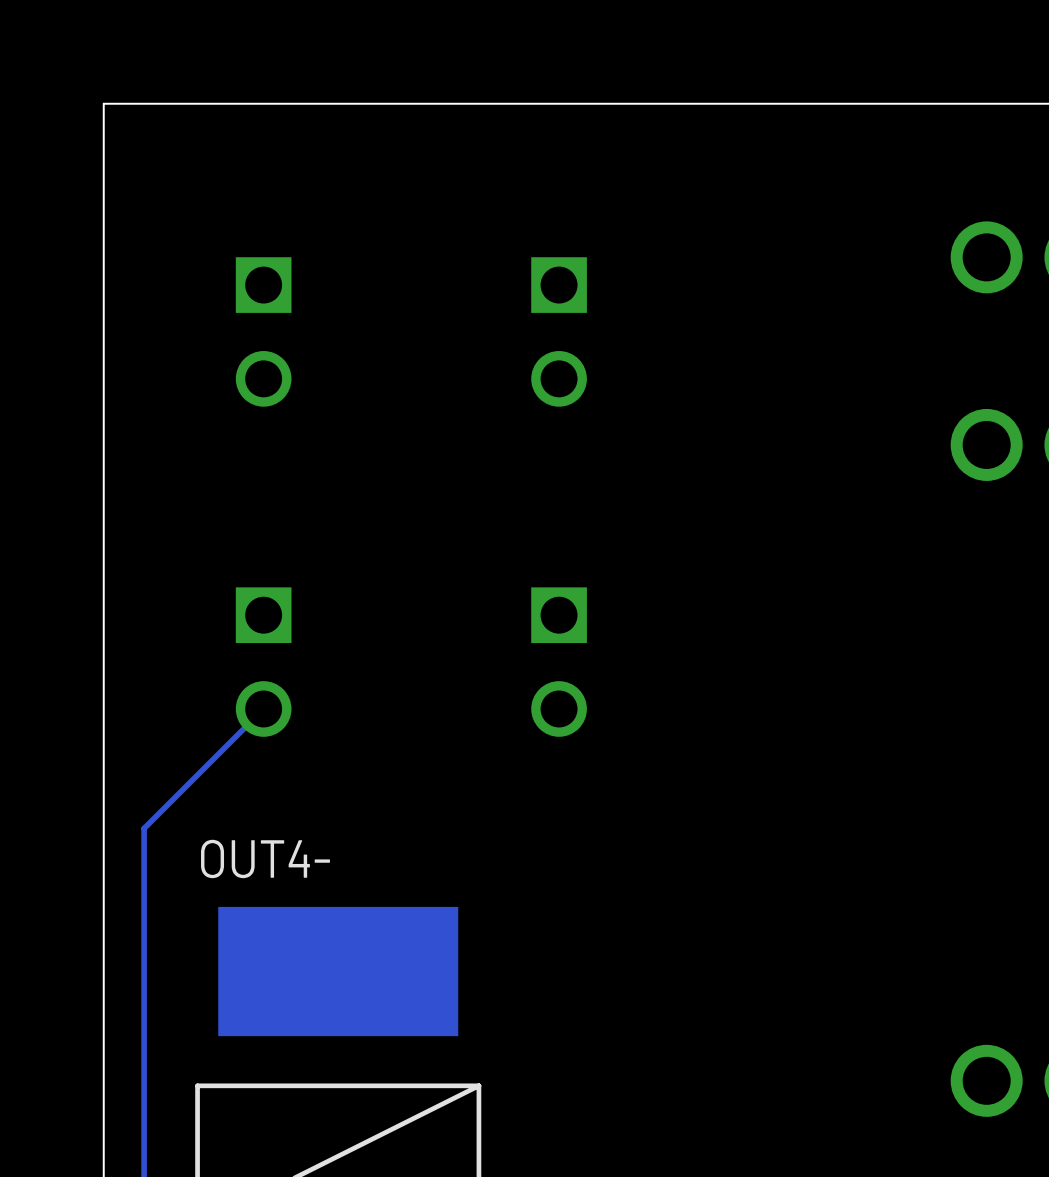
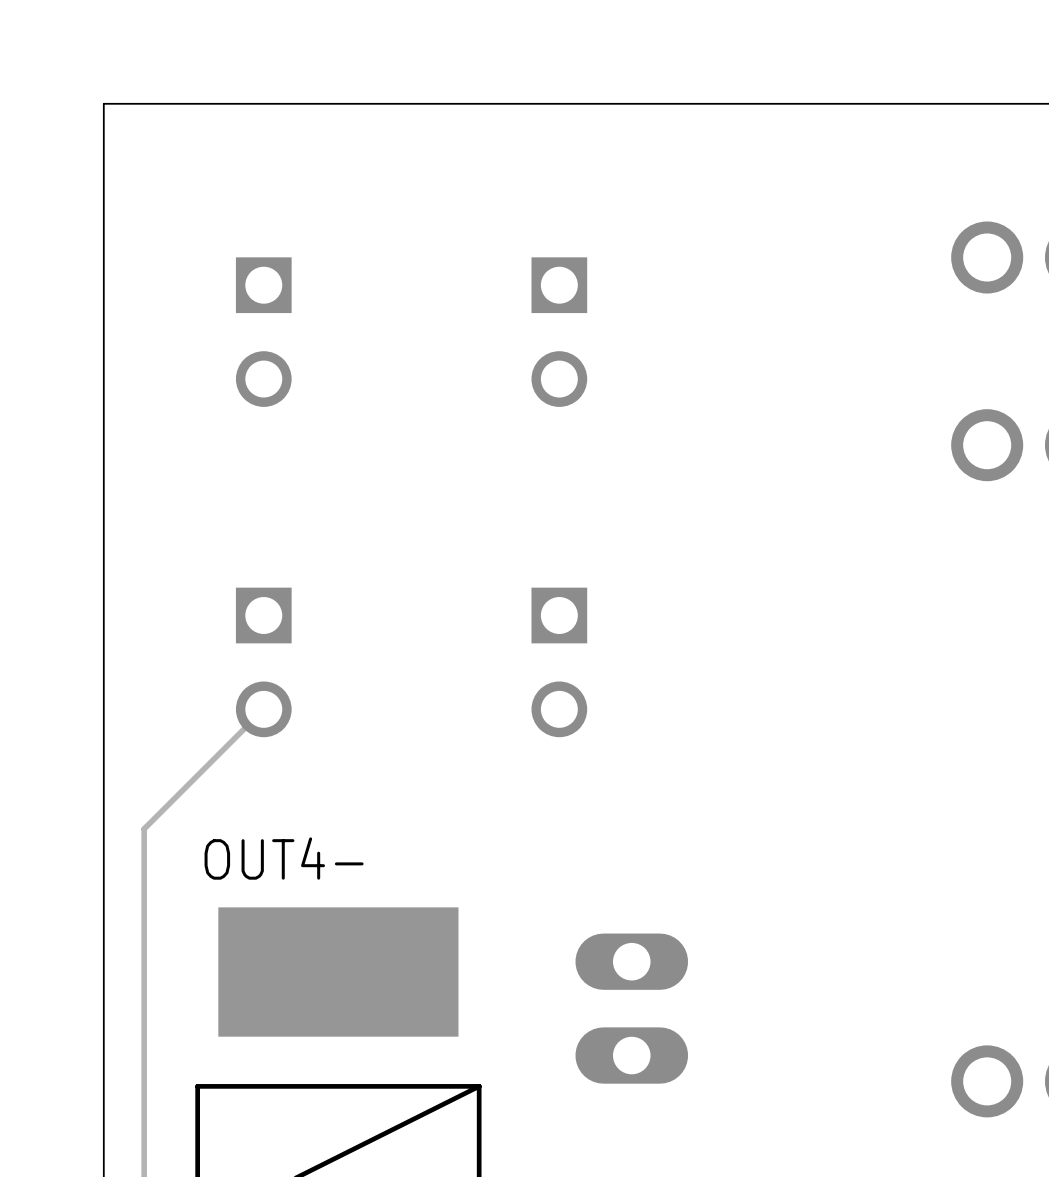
part: none -> (631, 1008)

